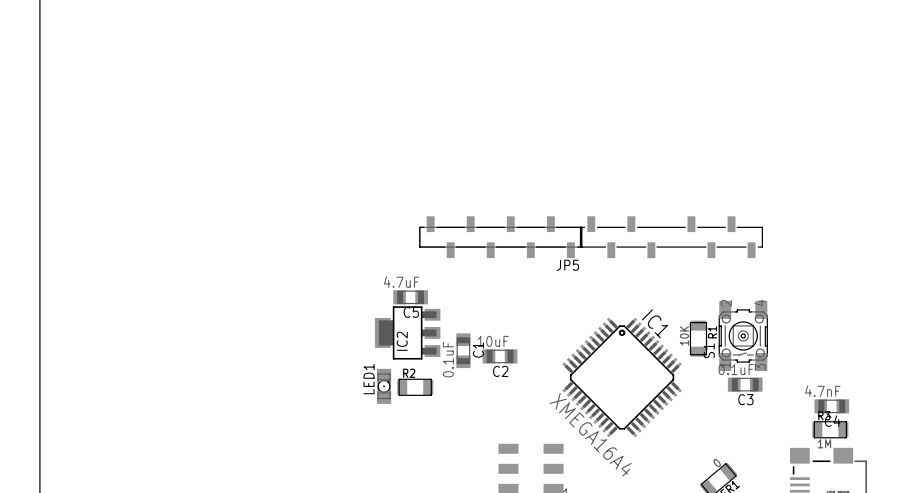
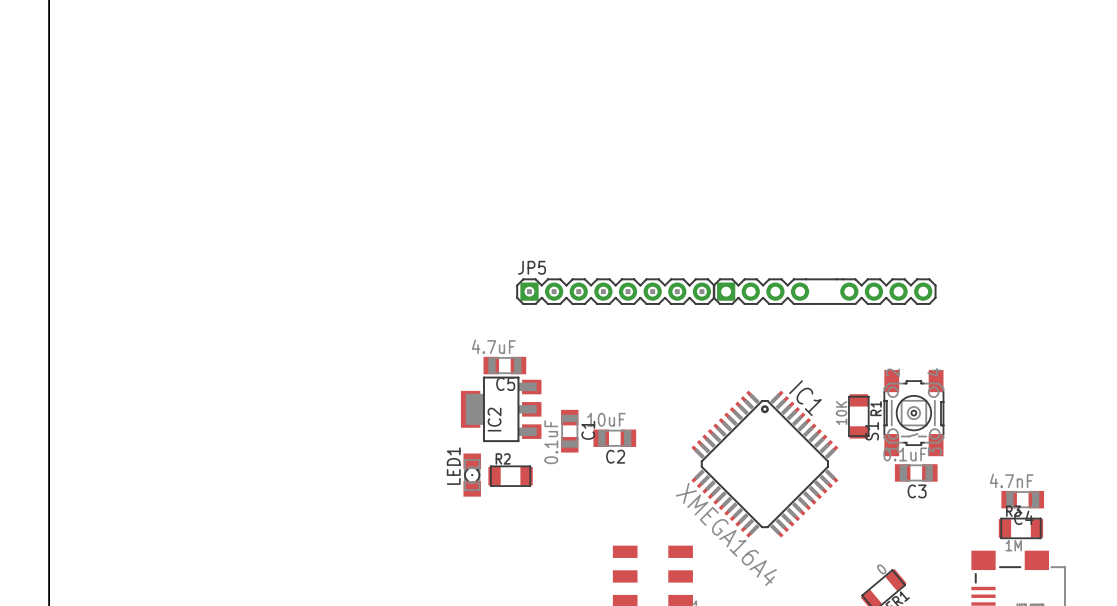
JP5 footprint: [419, 216, 583, 259] -> [516, 278, 716, 305]
part footprint: [579, 216, 763, 259] -> [712, 278, 937, 305]
JP5 name position: JP5 (567, 265) -> JP5 (532, 267)

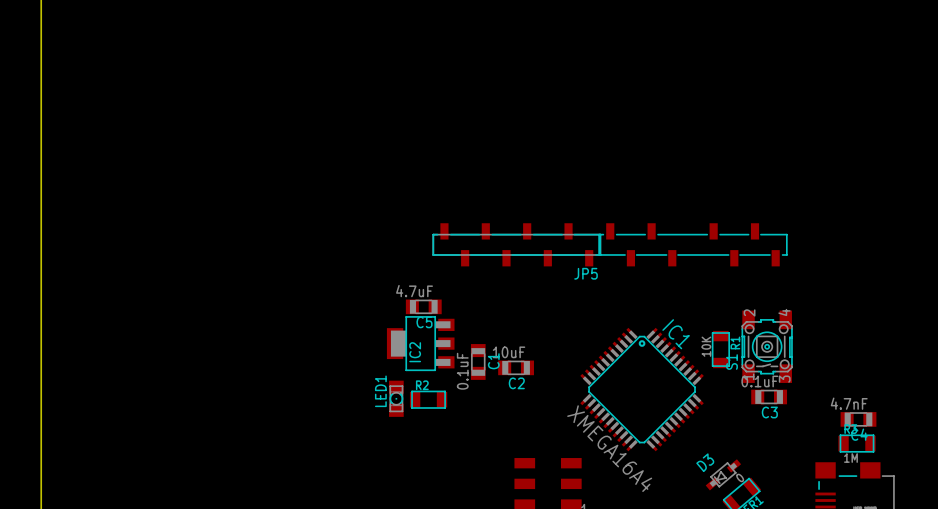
JP5 name position: JP5 (532, 267) -> JP5 (586, 273)
JP5 footprint: [516, 278, 716, 305] -> [432, 223, 601, 267]
part footprint: [712, 278, 937, 305] -> [598, 223, 788, 267]
D3: none -> (723, 474)

